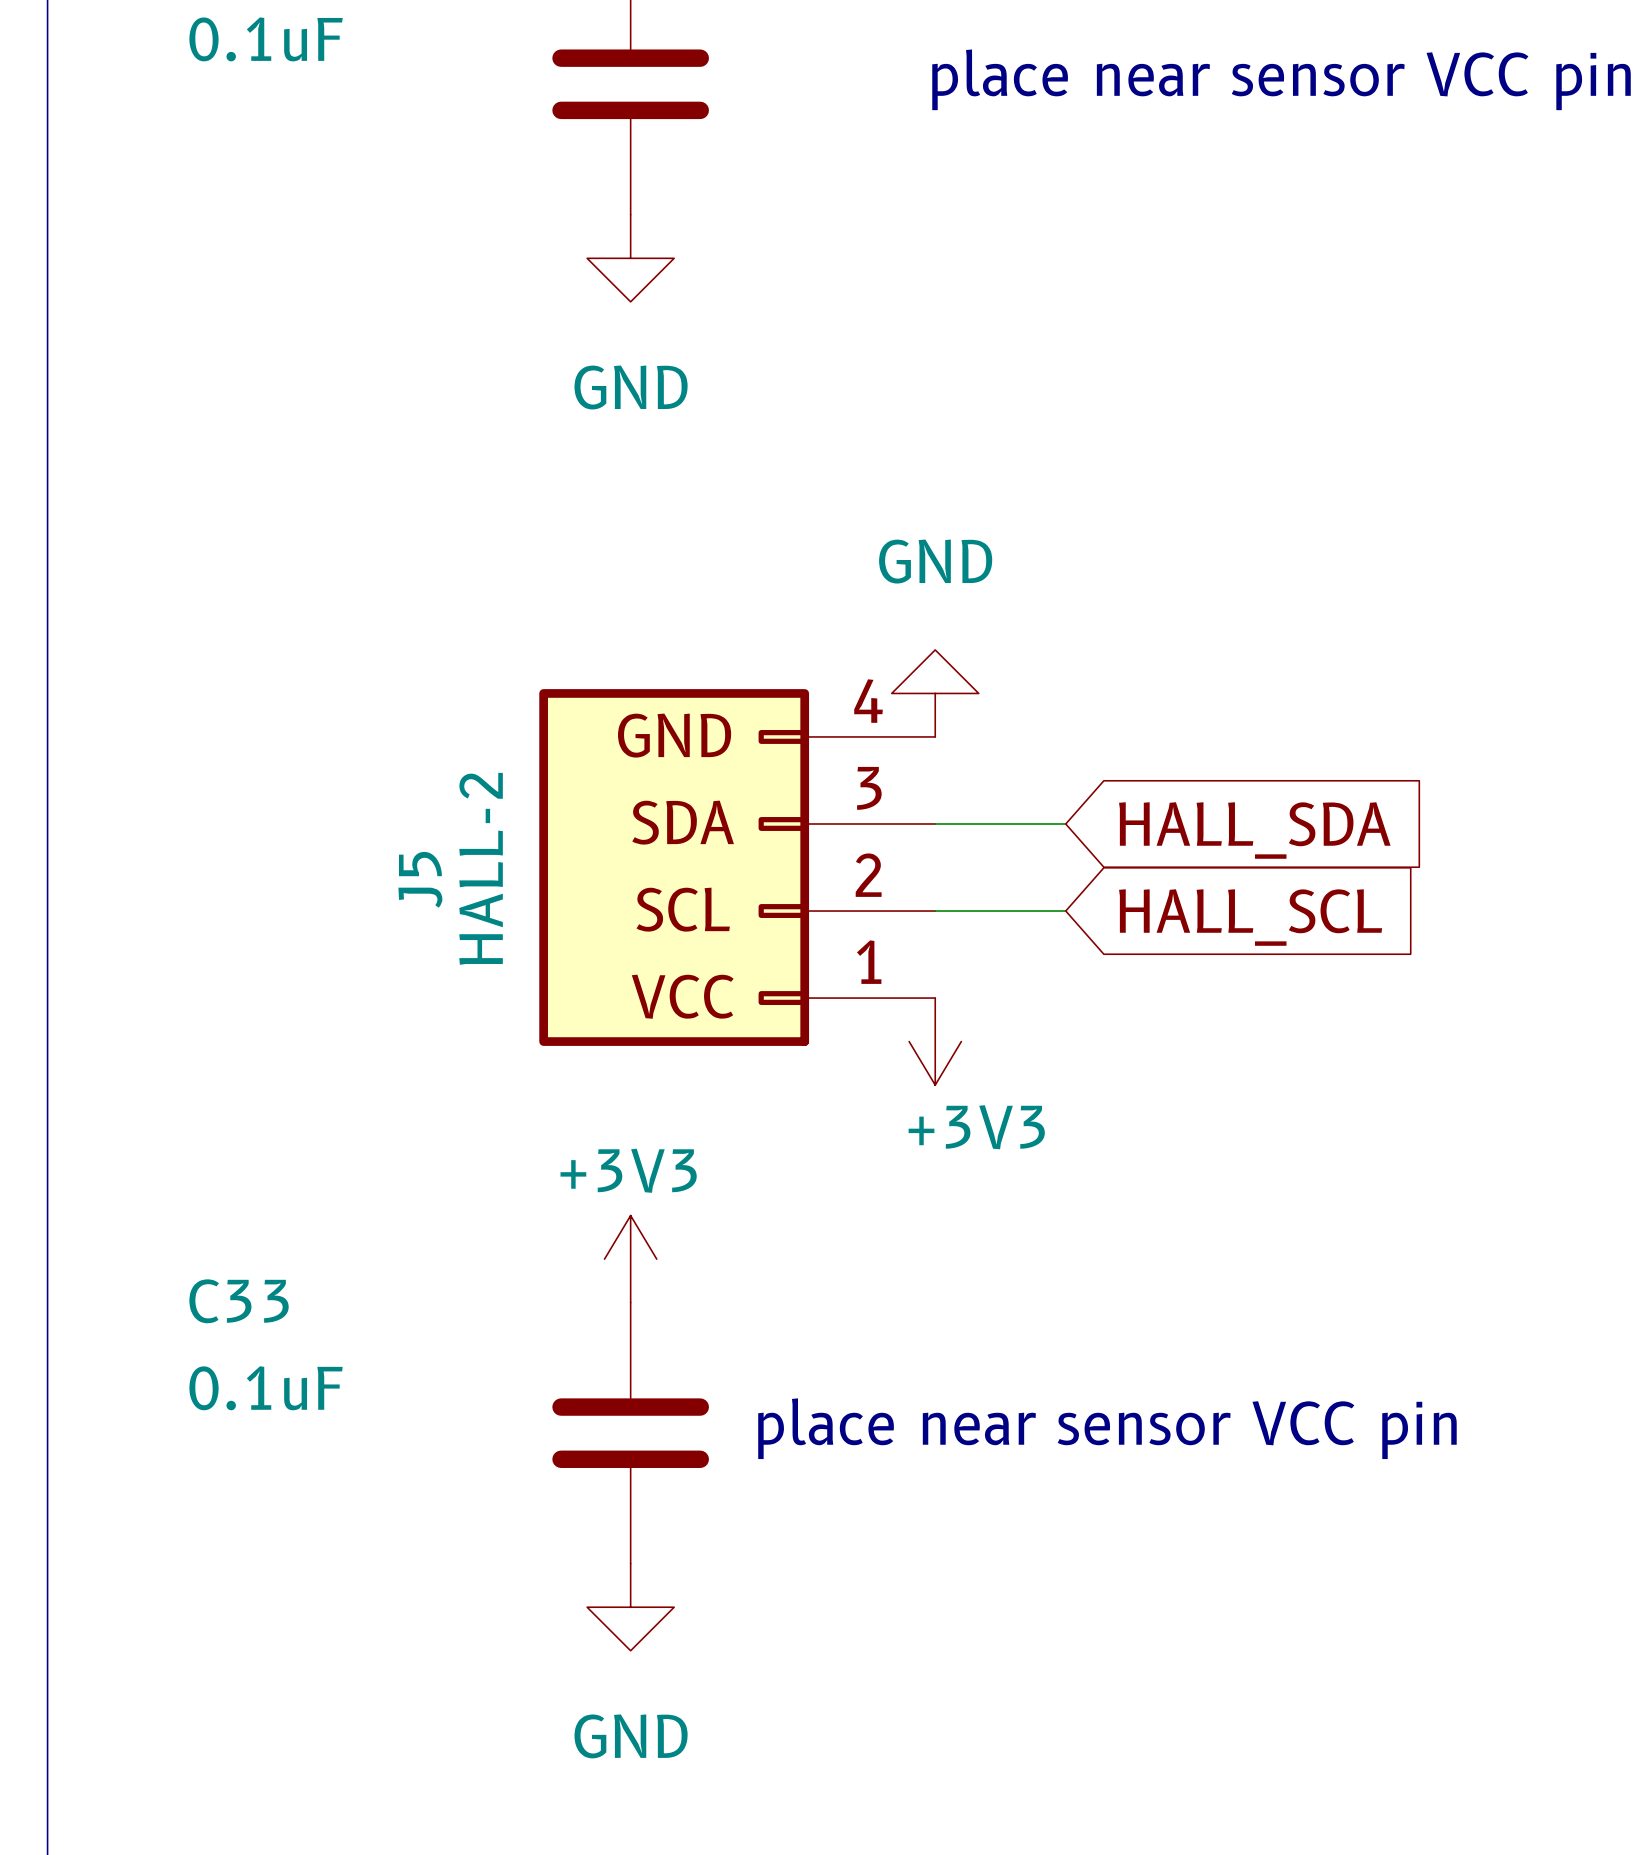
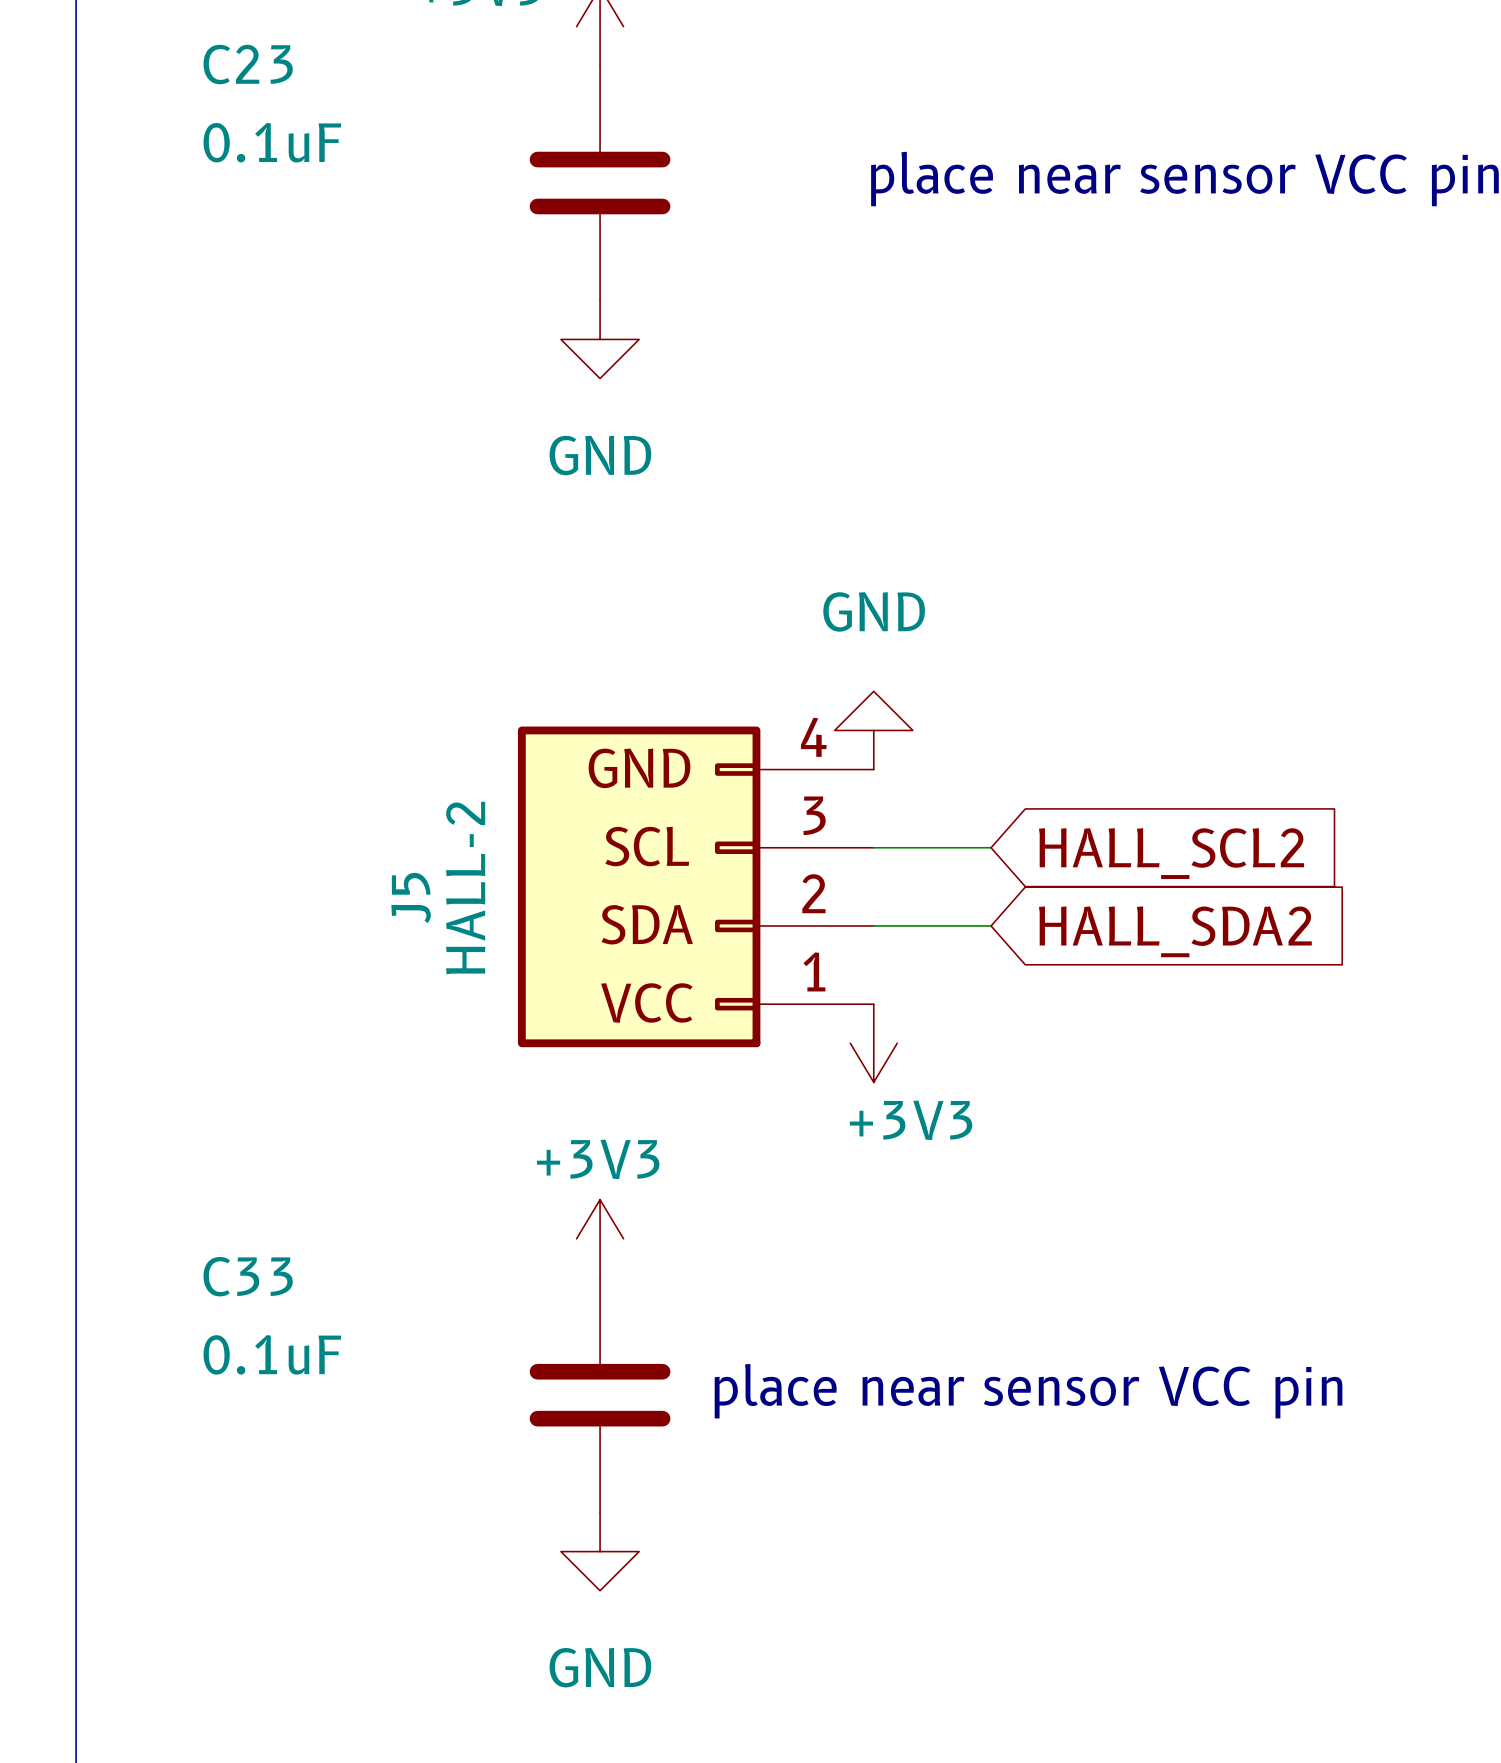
J5 text: SDA (683, 822) -> SCL (647, 846)
global label: HALL_SDA (1254, 830) -> HALL_SCL2 (1171, 853)
J5 text: SCL (683, 909) -> SDA (647, 924)
global label: HALL_SCL (1250, 917) -> HALL_SDA2 (1175, 931)

